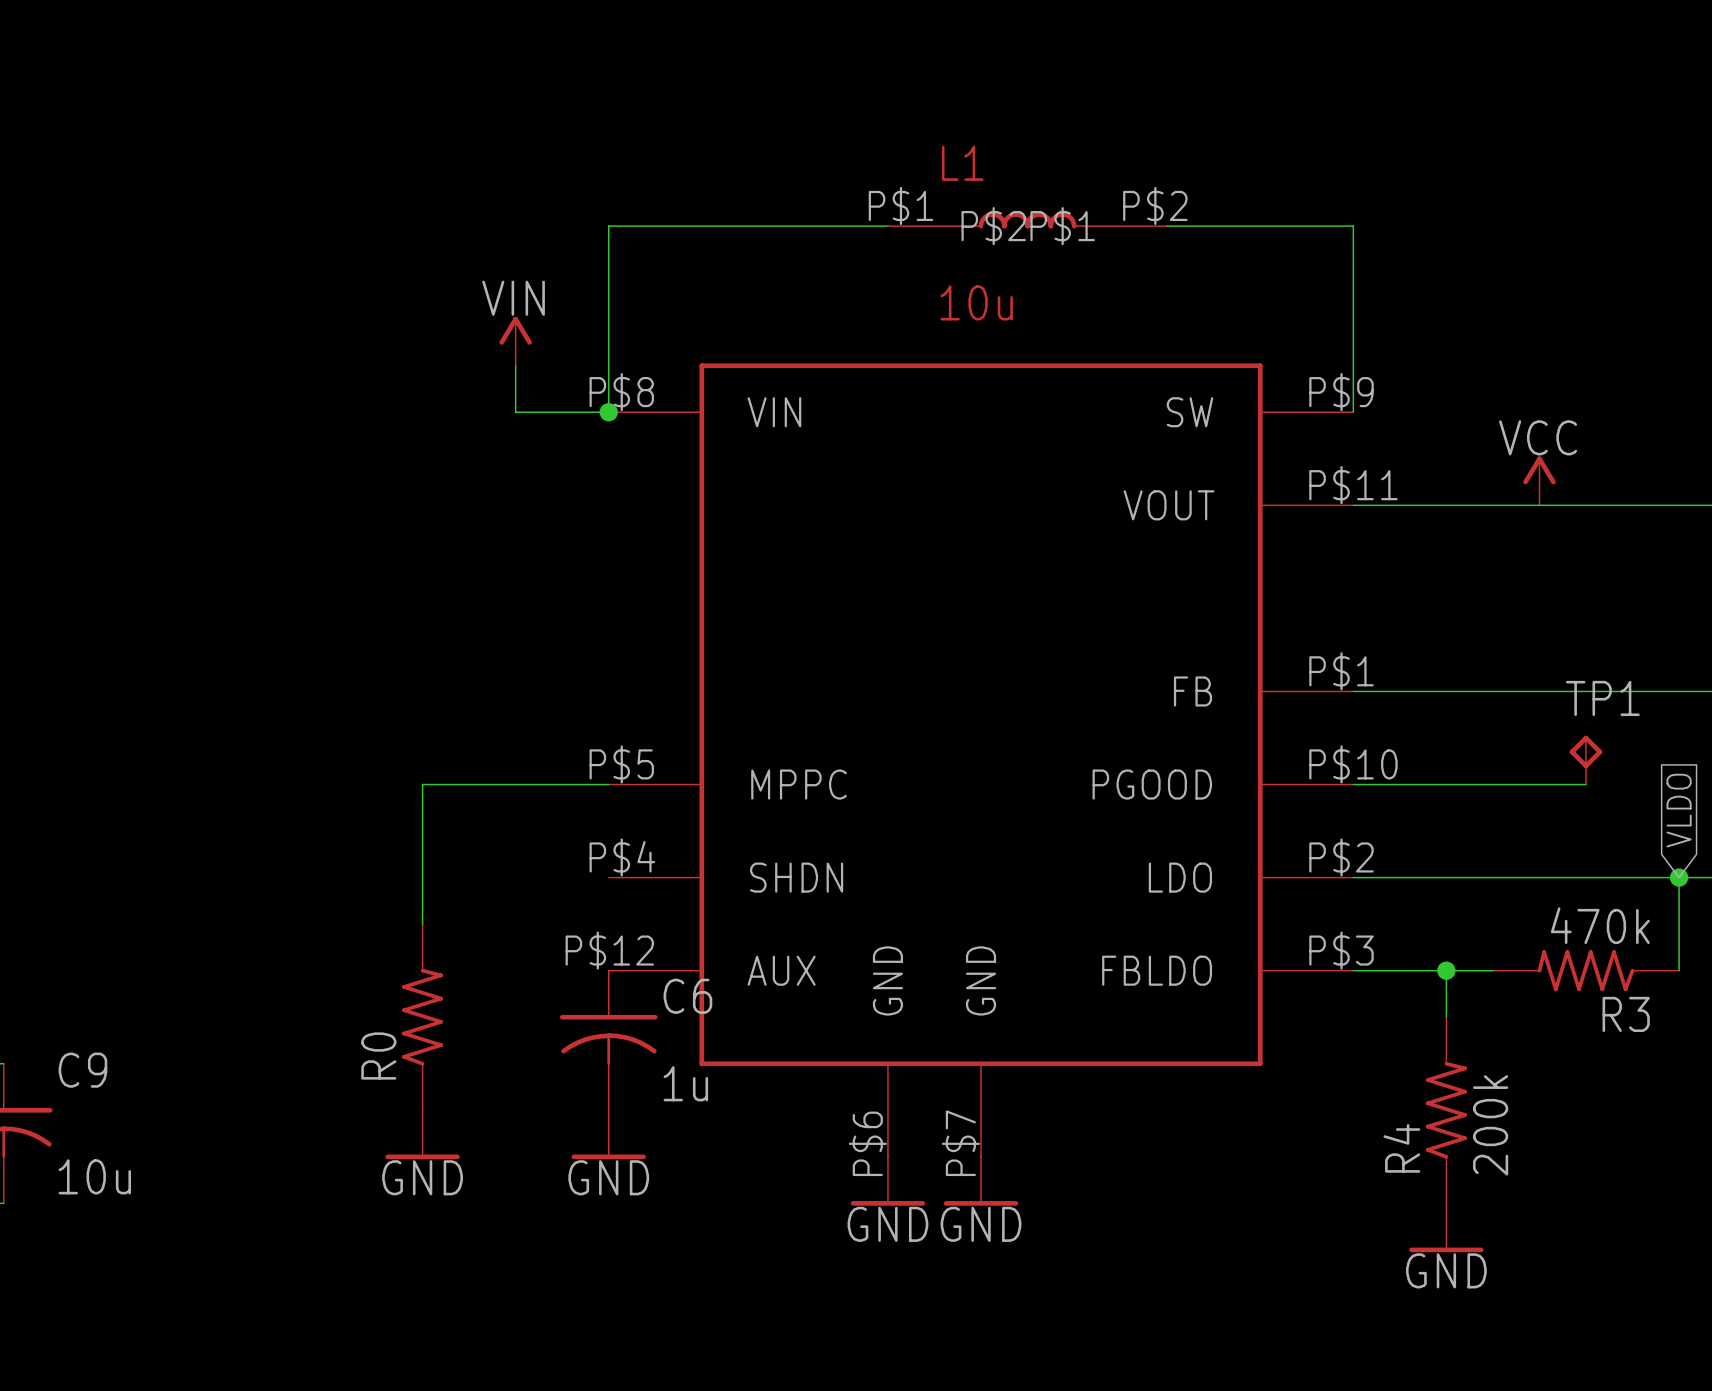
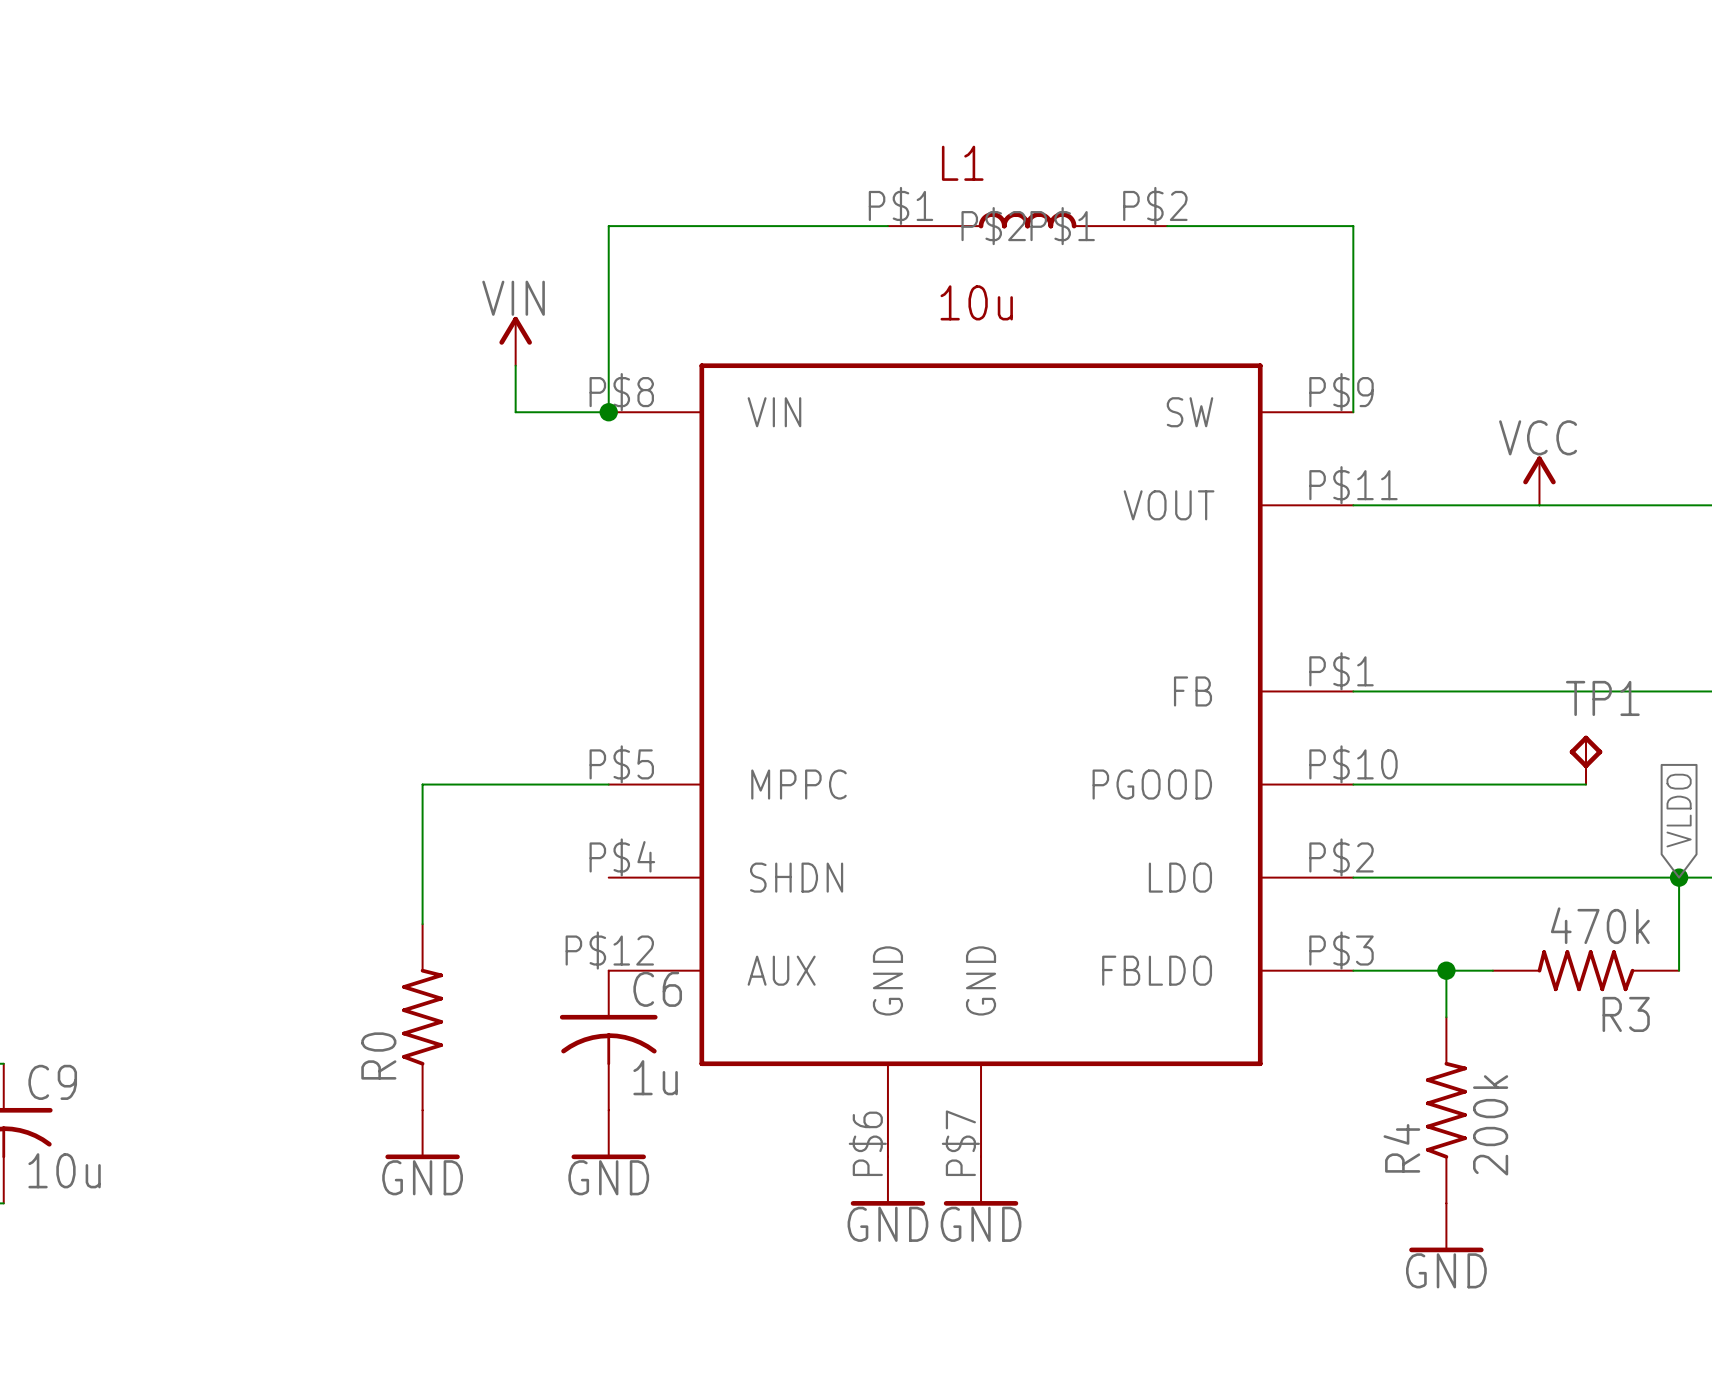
C6 name position: C6 (687, 996) -> C6 (657, 989)
C9 name position: C9 (82, 1070) -> C9 (52, 1082)
C6 value position: 1u (685, 1083) -> 1u (655, 1077)
C9 value position: 10u (94, 1176) -> 10u (64, 1170)

